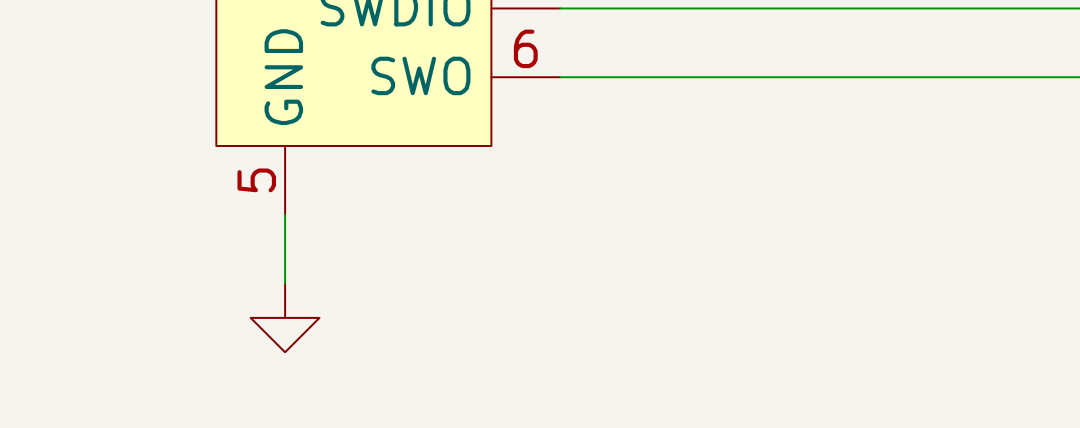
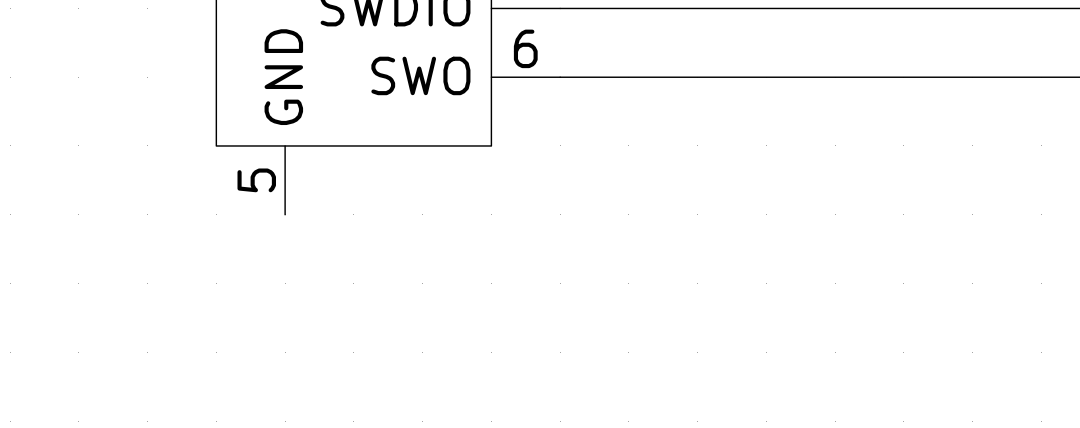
wire: (285, 214) (285, 283) -> none
power symbol: (285, 317) -> none

